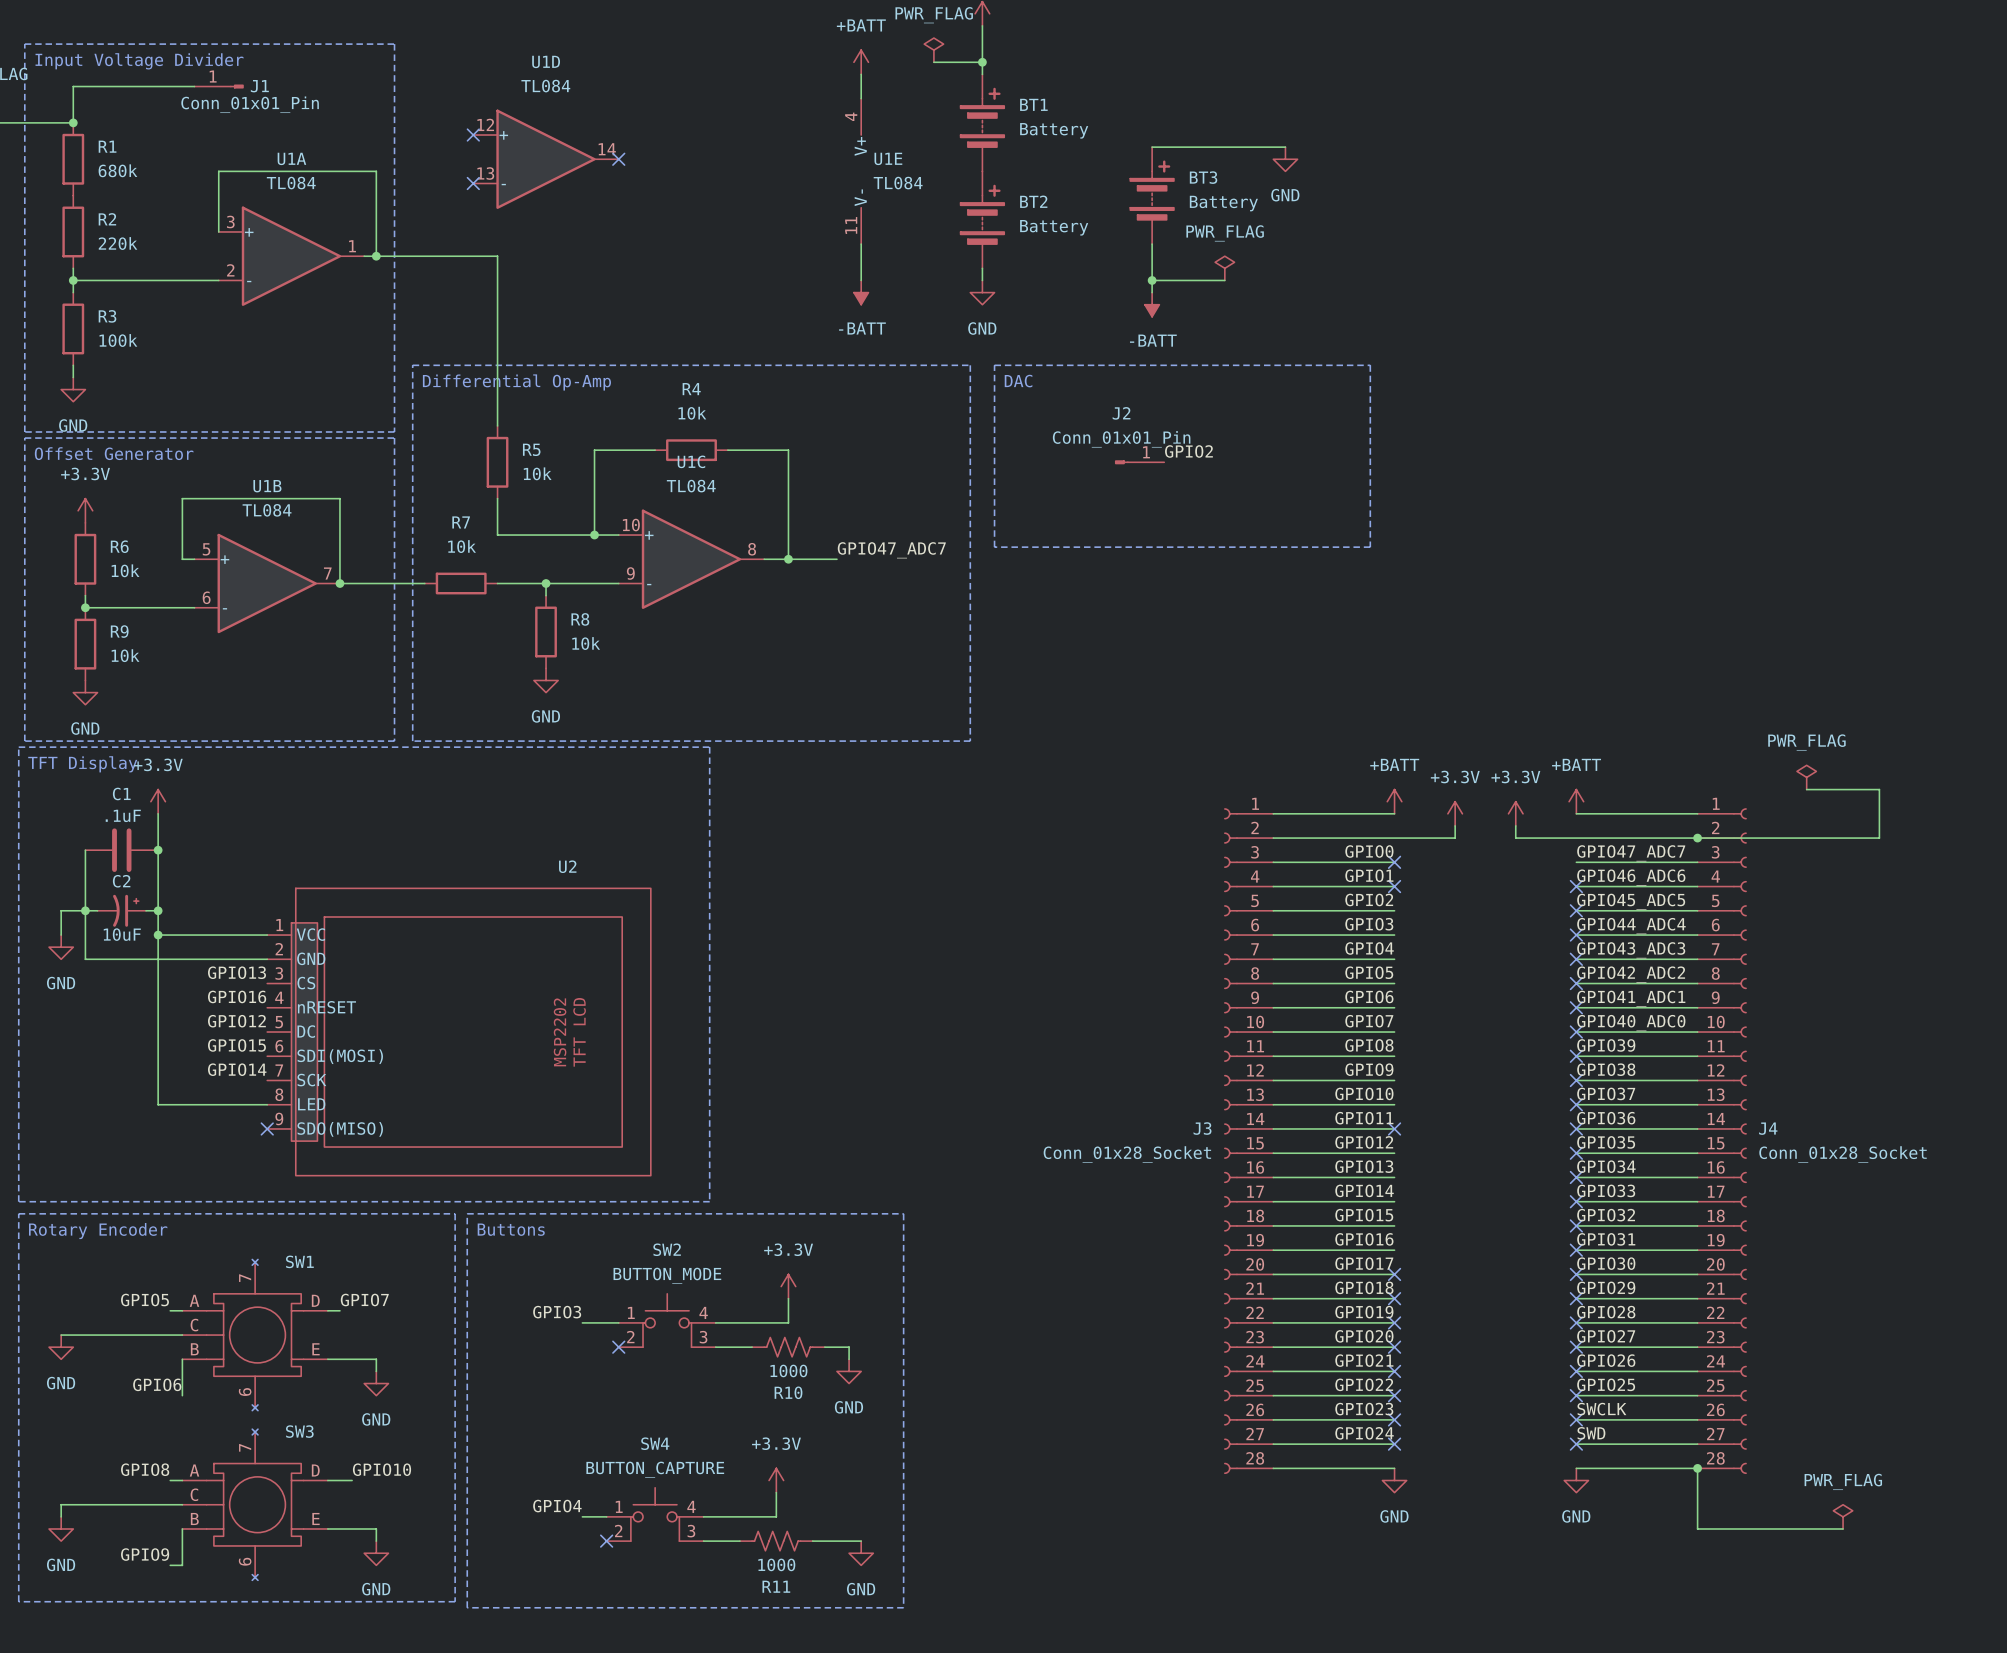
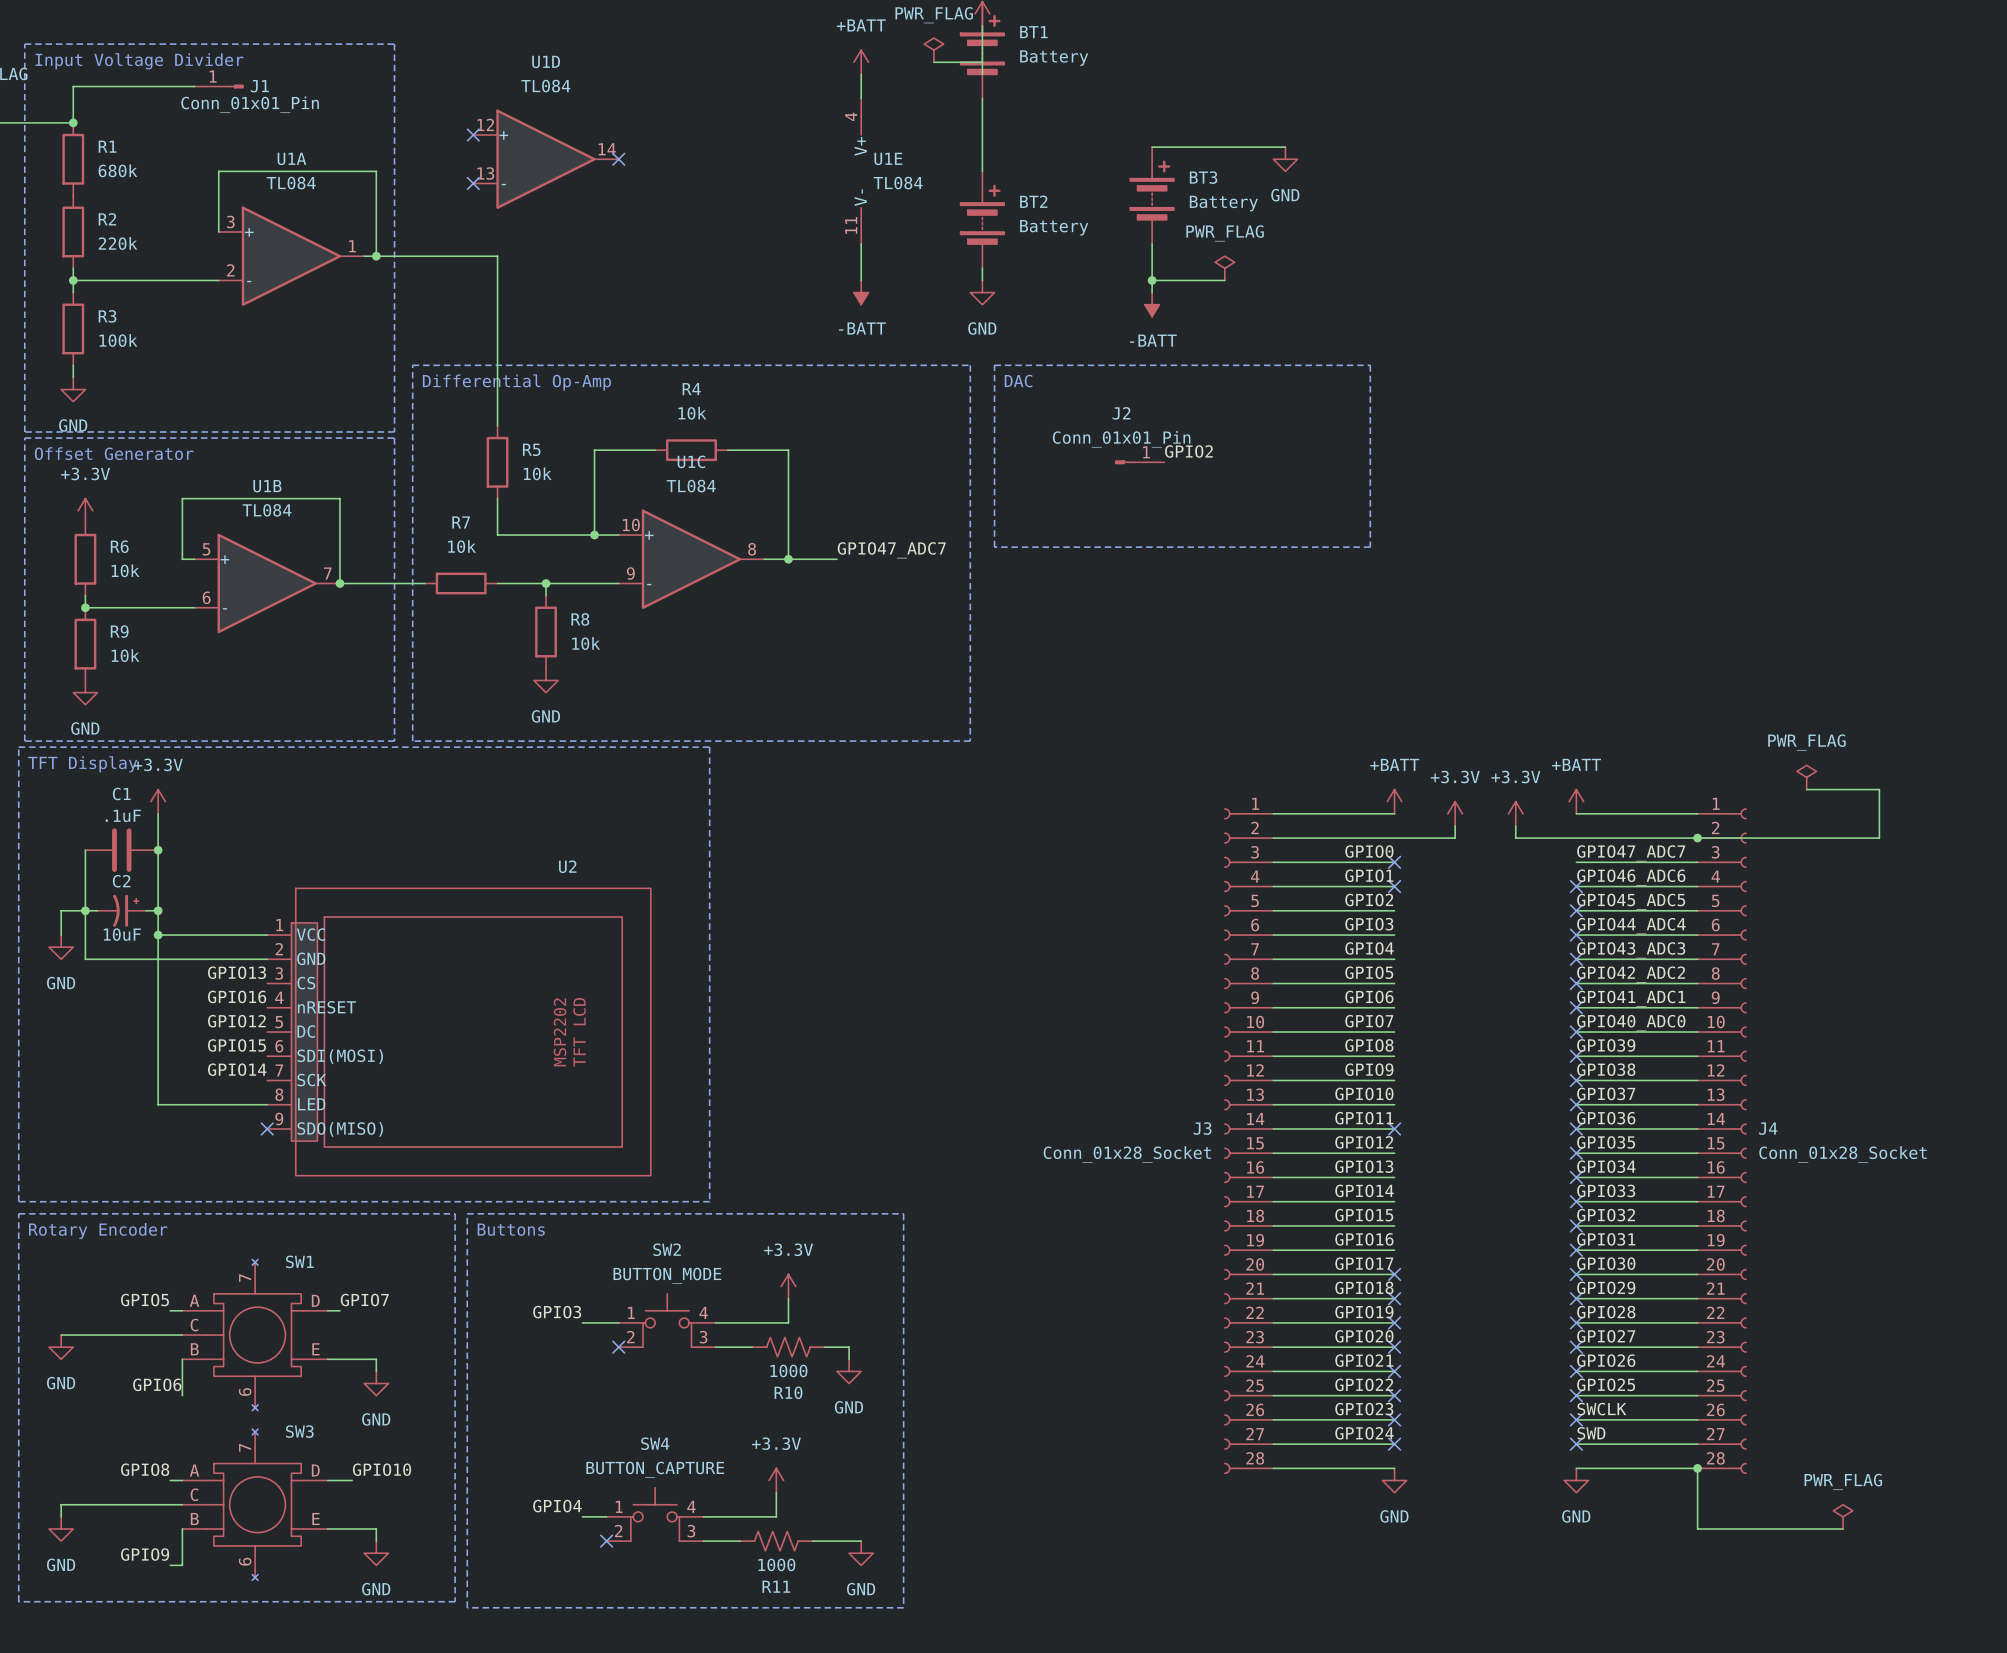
junction: (982, 62) -> none
BT1 position: (982, 122) -> (982, 50)

